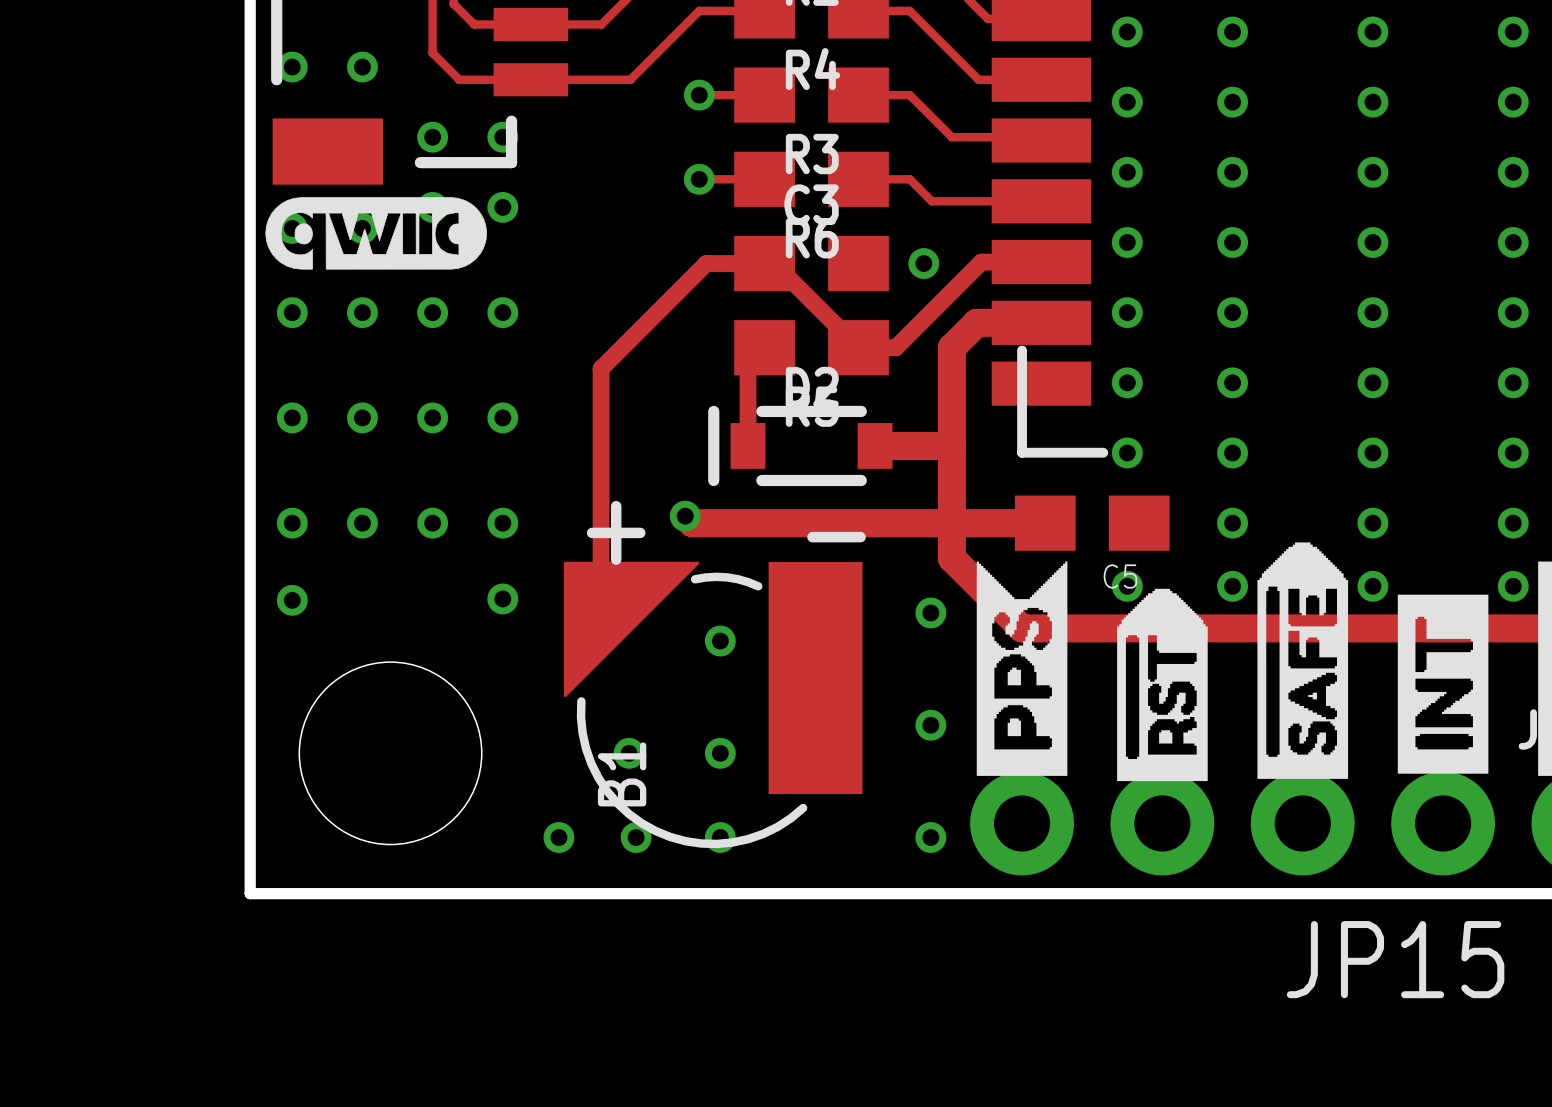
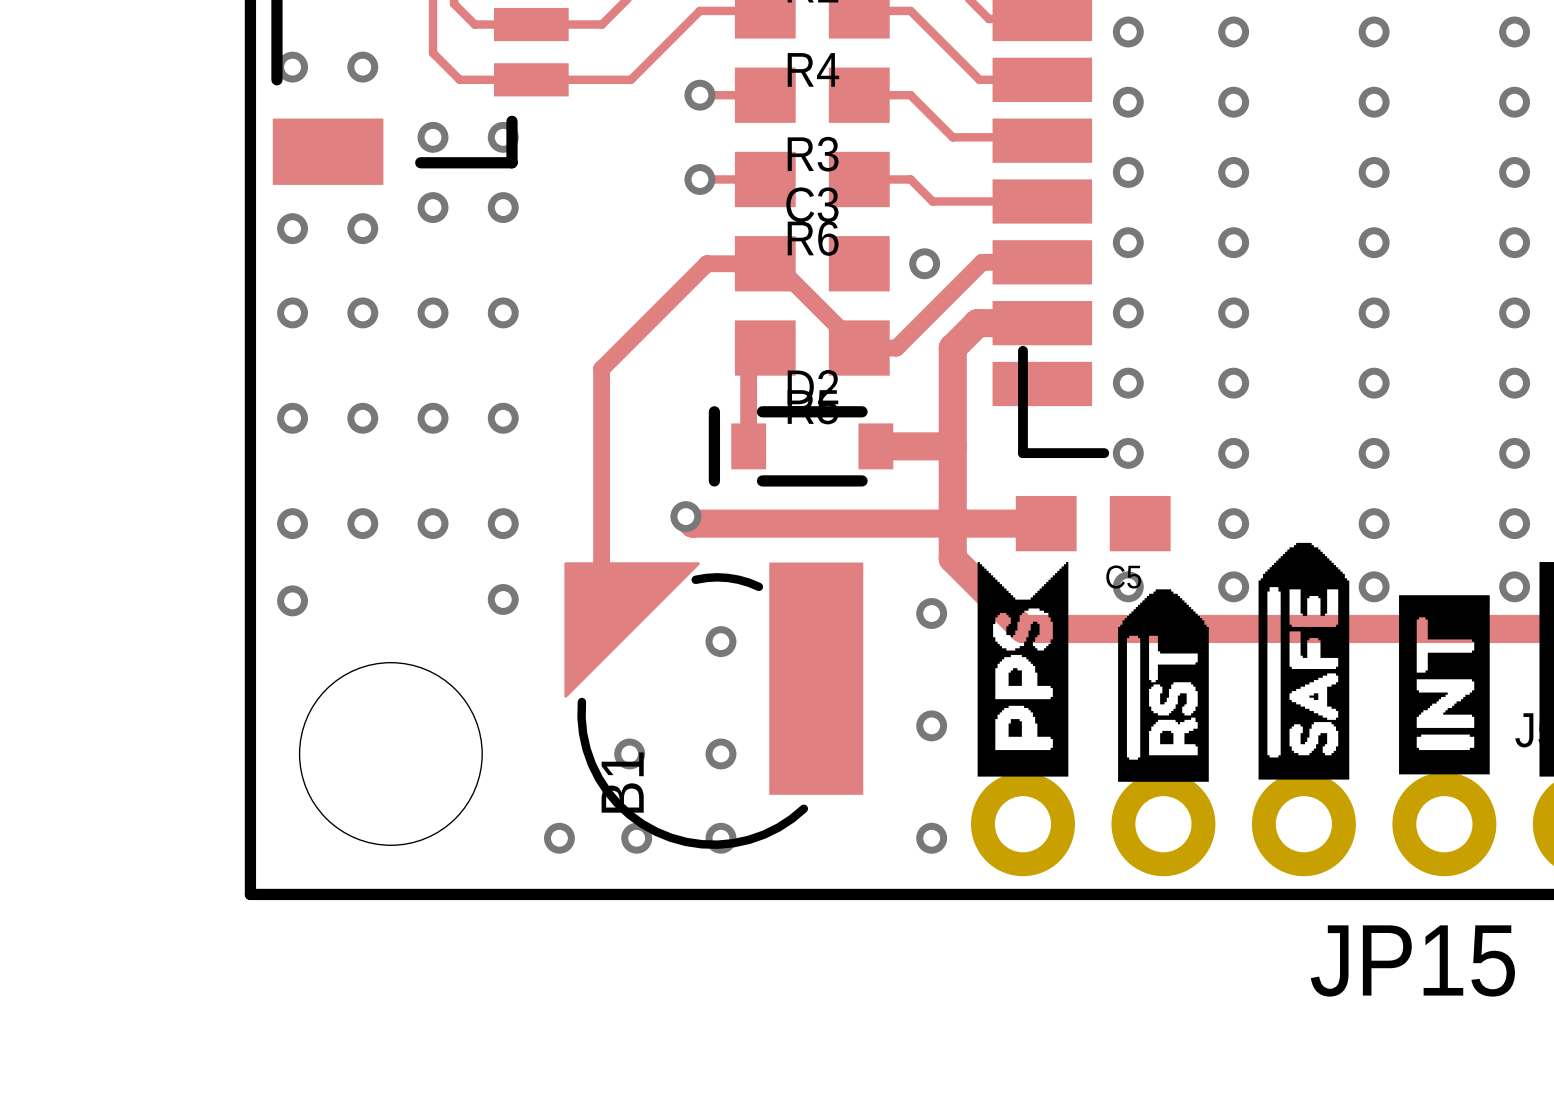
drawing: [265, 197, 488, 270] -> none
text: + (616, 532) -> none
text: - (836, 537) -> none

